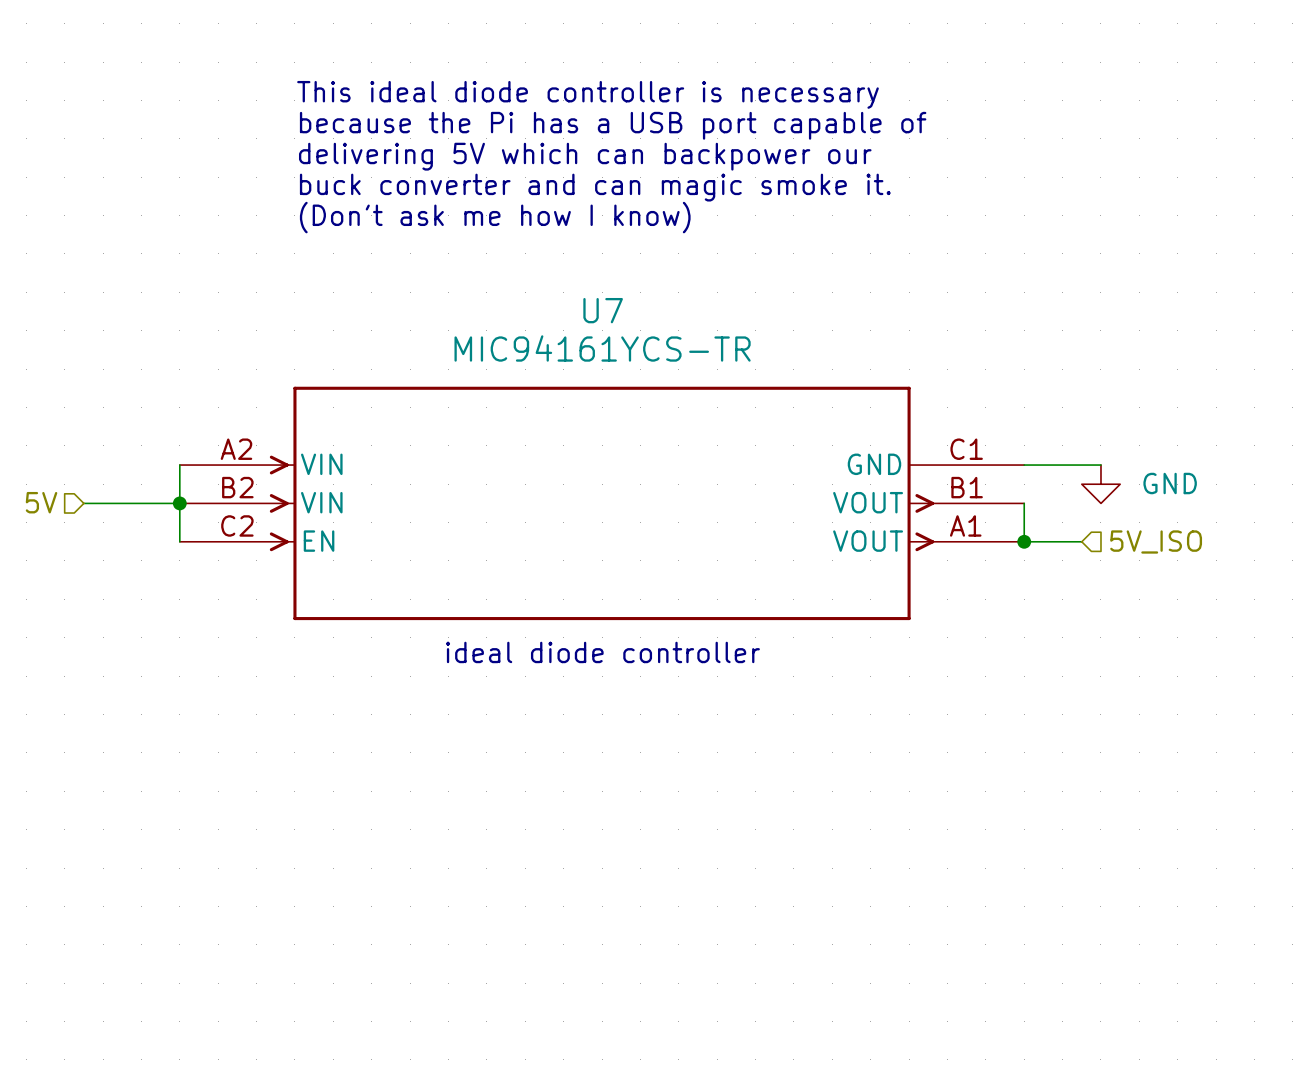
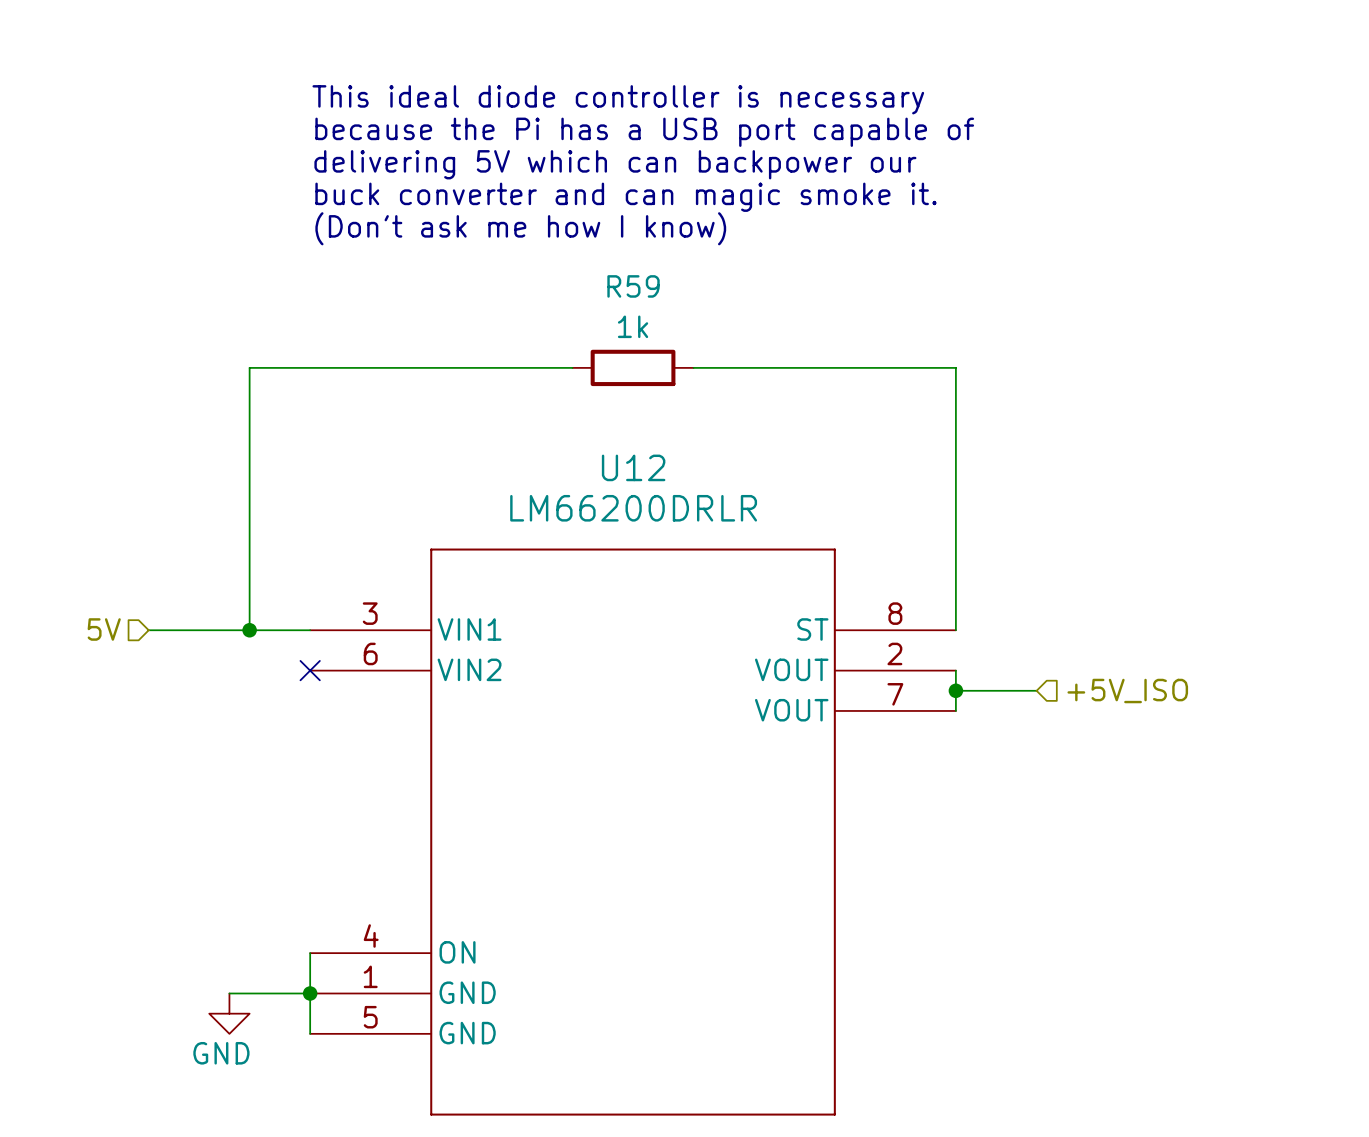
wire: none -> (572, 367) (249, 367) (249, 630)
R59: none -> 1k (633, 367)
wire: none -> (693, 367) (955, 367) (955, 630)
wire: (179, 465) (179, 541) -> none
wire: (1024, 465) (1100, 465) -> (955, 690) (1036, 690)
power symbol: GND (1100, 484) -> none
hierarchical label position: 5V (41, 502) -> 5V (104, 629)
wire: (83, 503) (179, 503) -> none
junction: (179, 503) -> none
U7: MIC94161YCS-TR (602, 503) -> none
wire: (1024, 503) (1024, 541) (1081, 541) -> none
junction: (1024, 541) -> none
hierarchical label: 5V_ISO (1156, 541) -> none
wire: none -> (148, 630) (310, 630)
junction: none -> (249, 630)
no-connect mark: none -> (310, 670)
wire: none -> (955, 670) (955, 710)
text: ideal diode controller (602, 652) -> none
junction: none -> (955, 690)
hierarchical label: none -> +5V_ISO (1127, 691)
U12: none -> LM66200DRLR (633, 832)
wire: none -> (310, 953) (310, 1033)
wire: none -> (229, 993) (310, 993)
junction: none -> (310, 993)
power symbol: none -> GND (229, 1013)

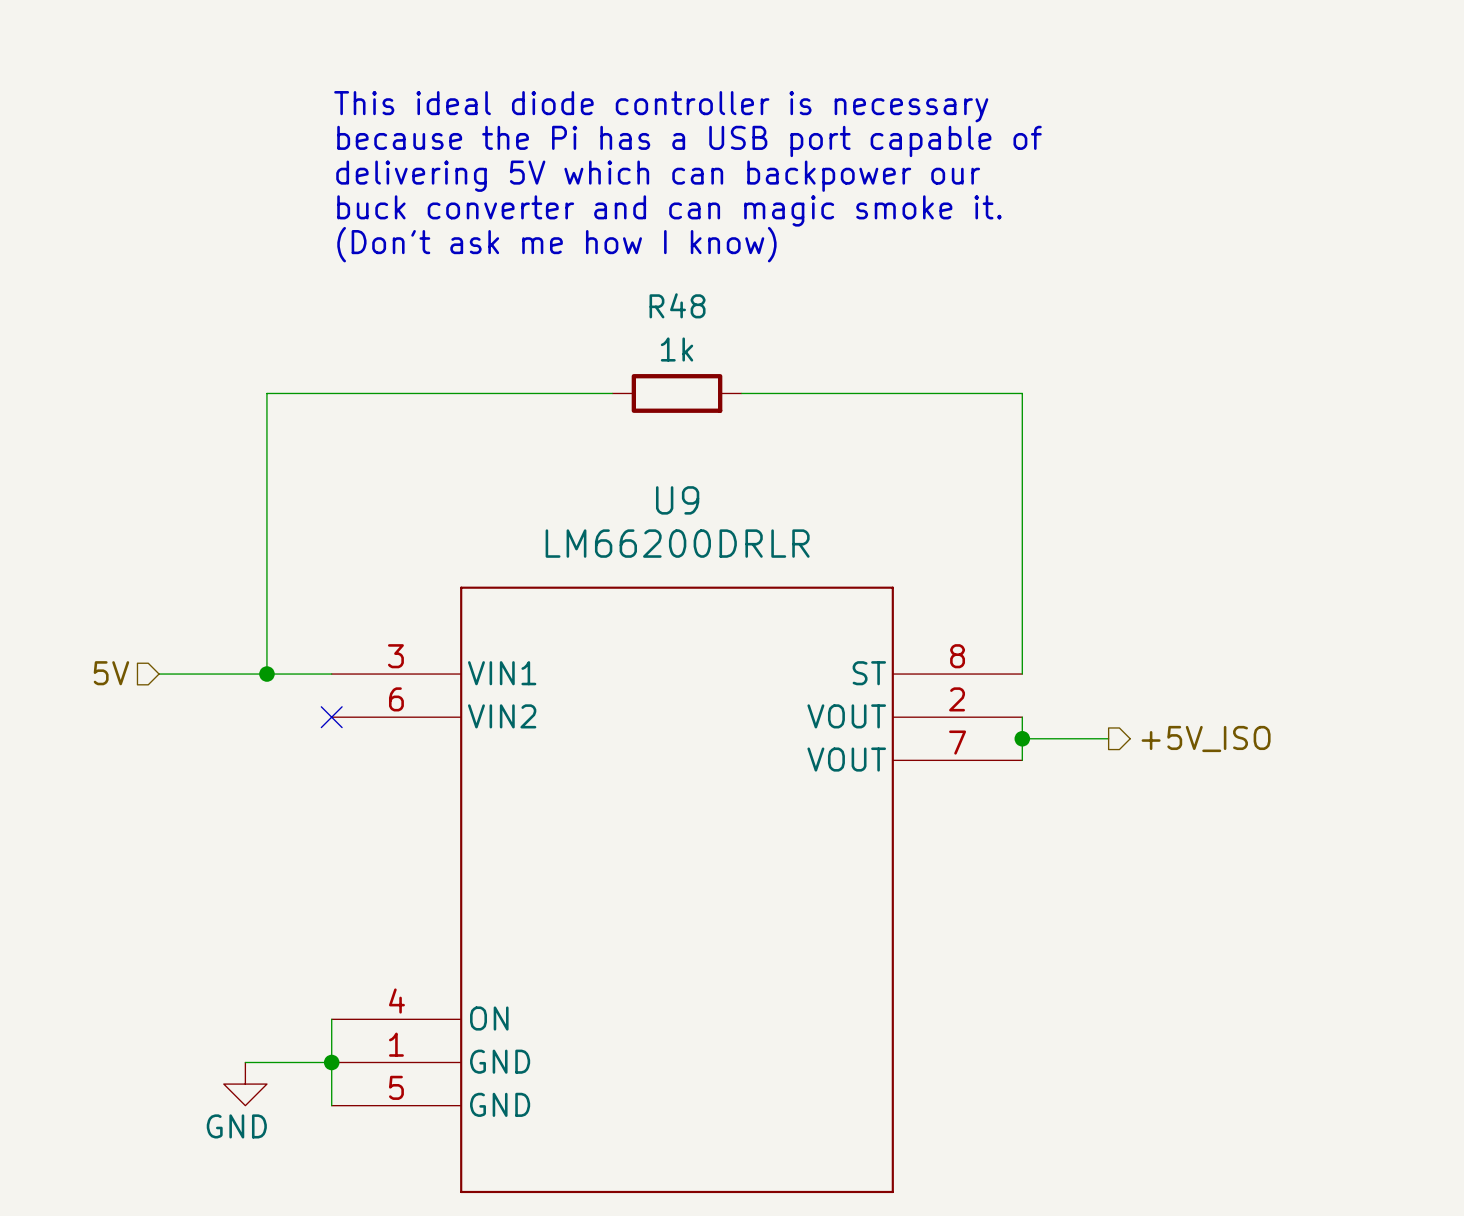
R59 name: R59 (633, 286) -> R48 (677, 305)
U12 name: U12 (633, 467) -> U9 (677, 500)
hierarchical label shape: input (1127, 691) -> output (1206, 738)

